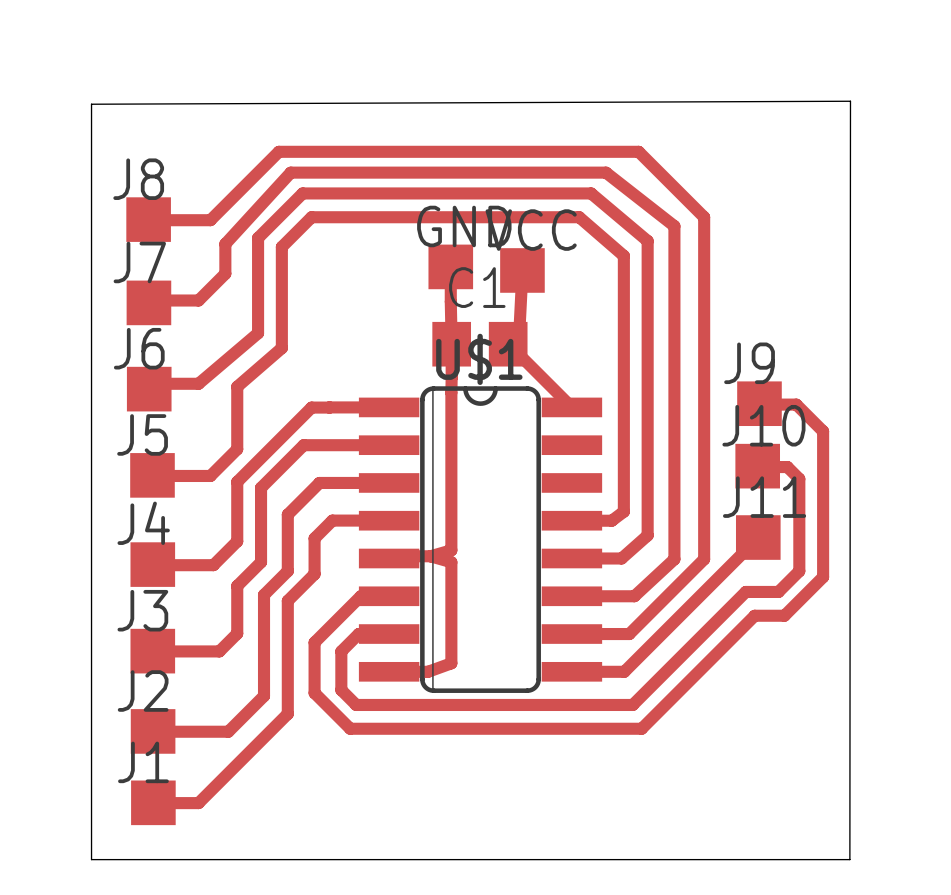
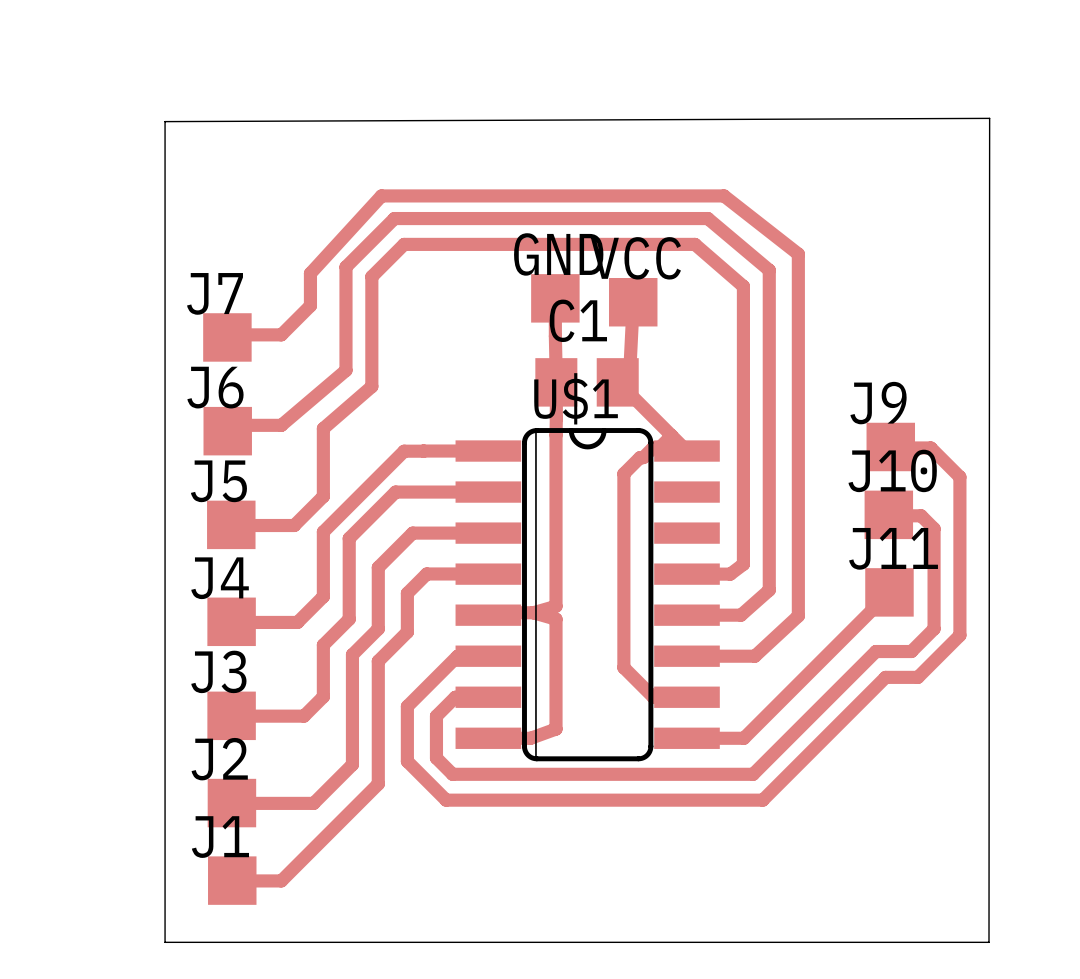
track: (148, 219) (210, 220) (278, 151) (638, 151) (704, 217) (704, 559) (629, 634) (571, 634) -> (671, 435) (659, 447) (652, 447) (643, 457) (640, 457) (623, 473) (623, 667) (653, 697) (686, 697)
J8: (148, 219) -> none

